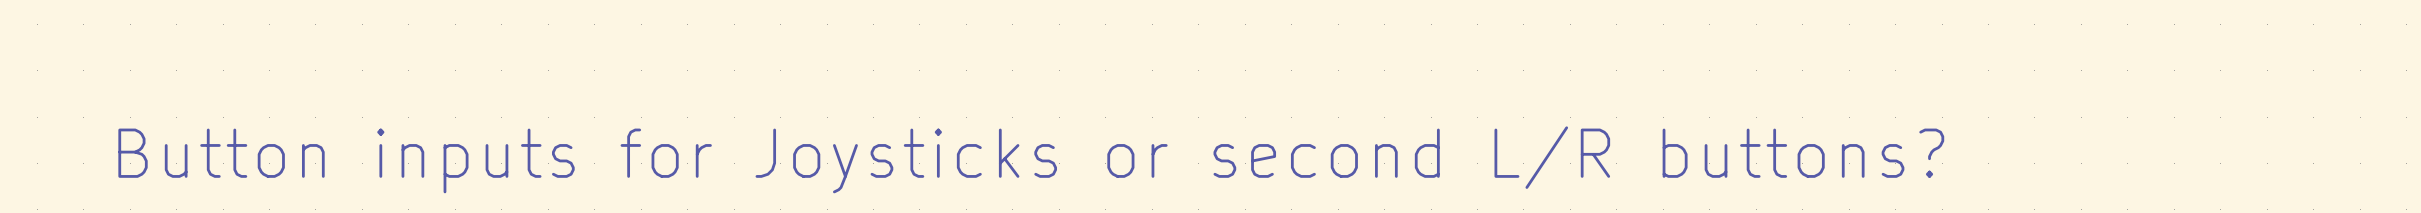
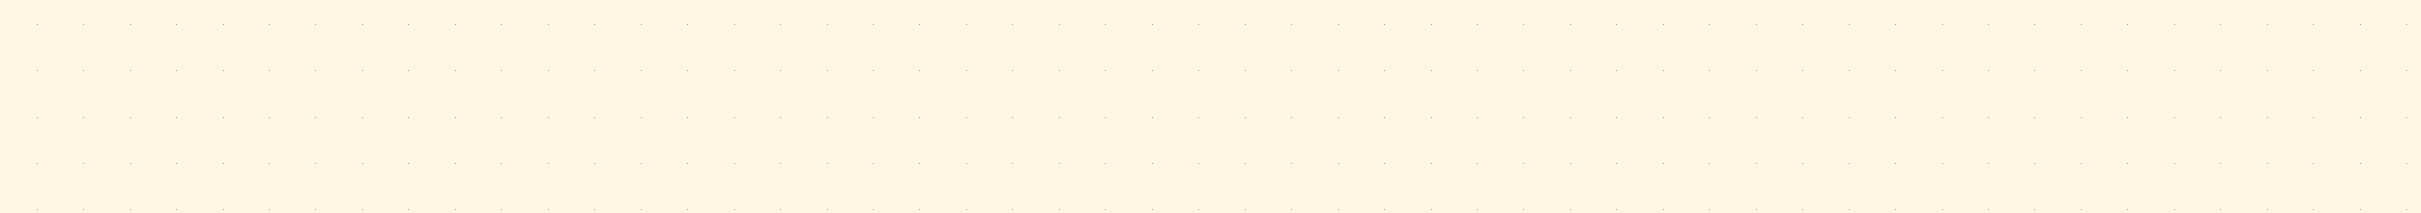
text: Button inputs for Joysticks or second L/R buttons? (1031, 159) -> none

